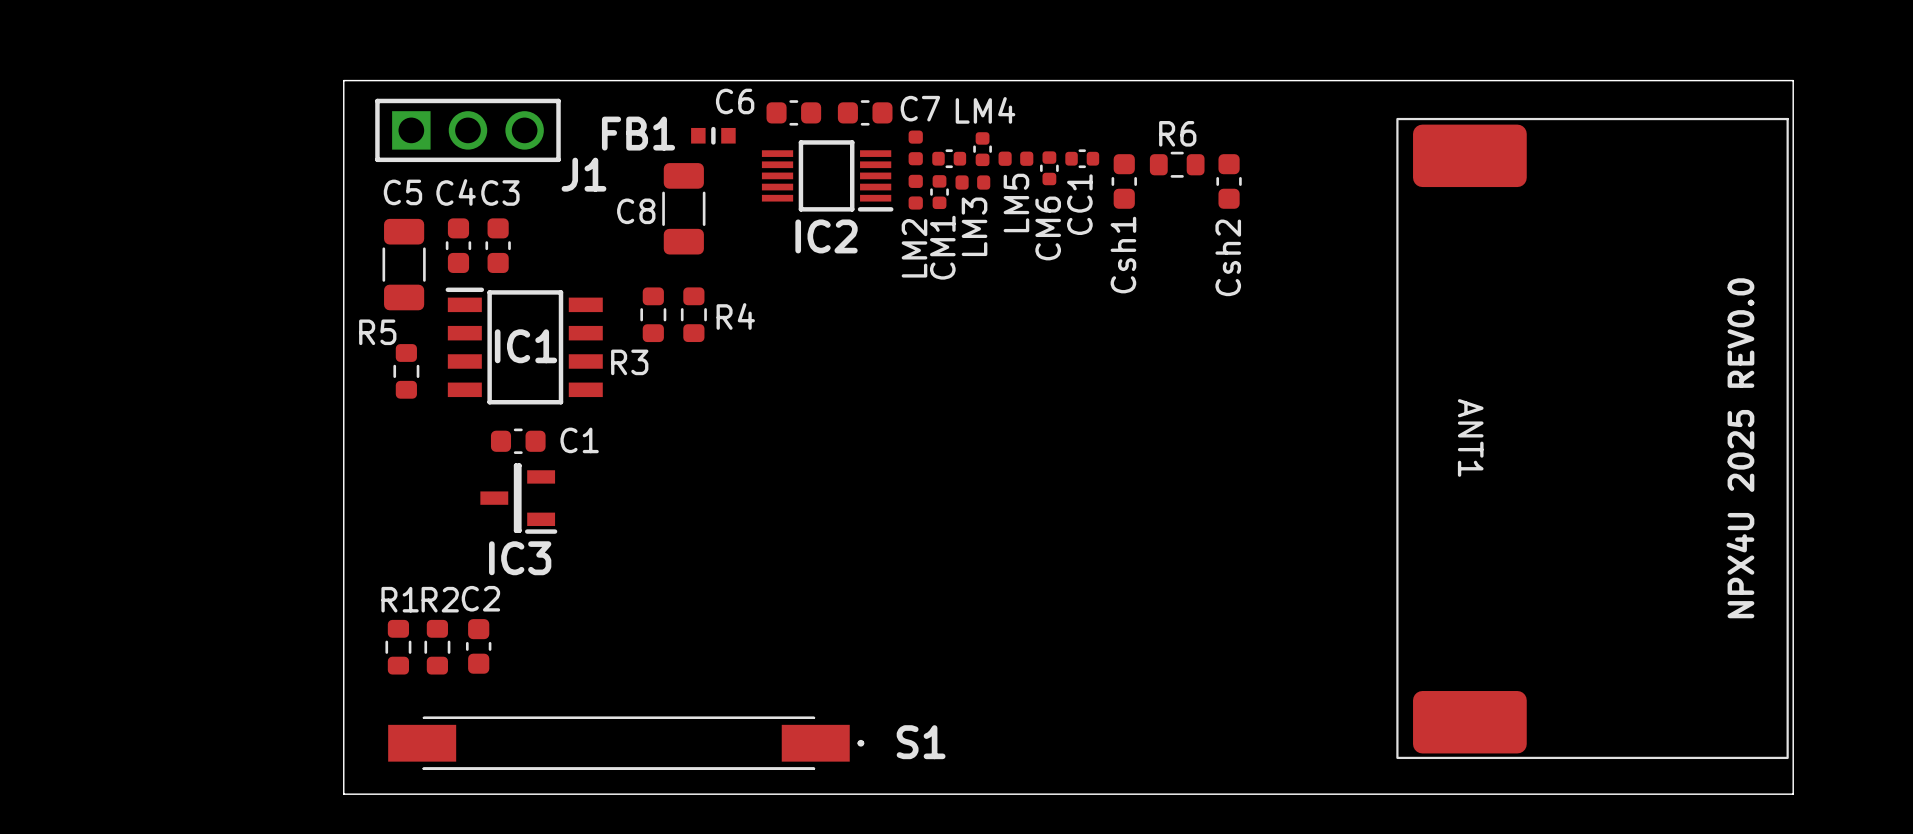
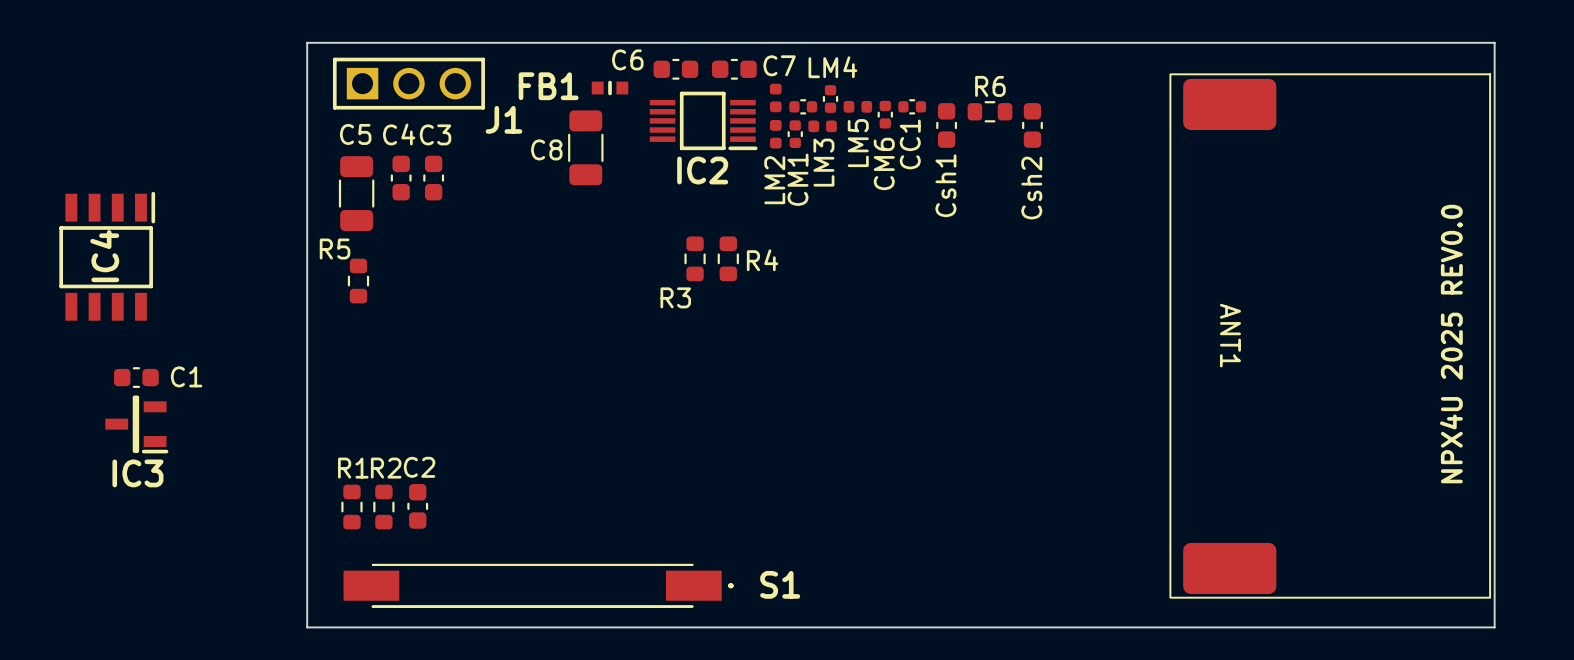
R3 position: (653, 314) -> (695, 258)
R4 position: (693, 314) -> (728, 258)
IC4: none -> (107, 256)
IC1: (524, 346) -> none
C1 position: (518, 441) -> (136, 377)
IC3 position: (518, 498) -> (136, 424)

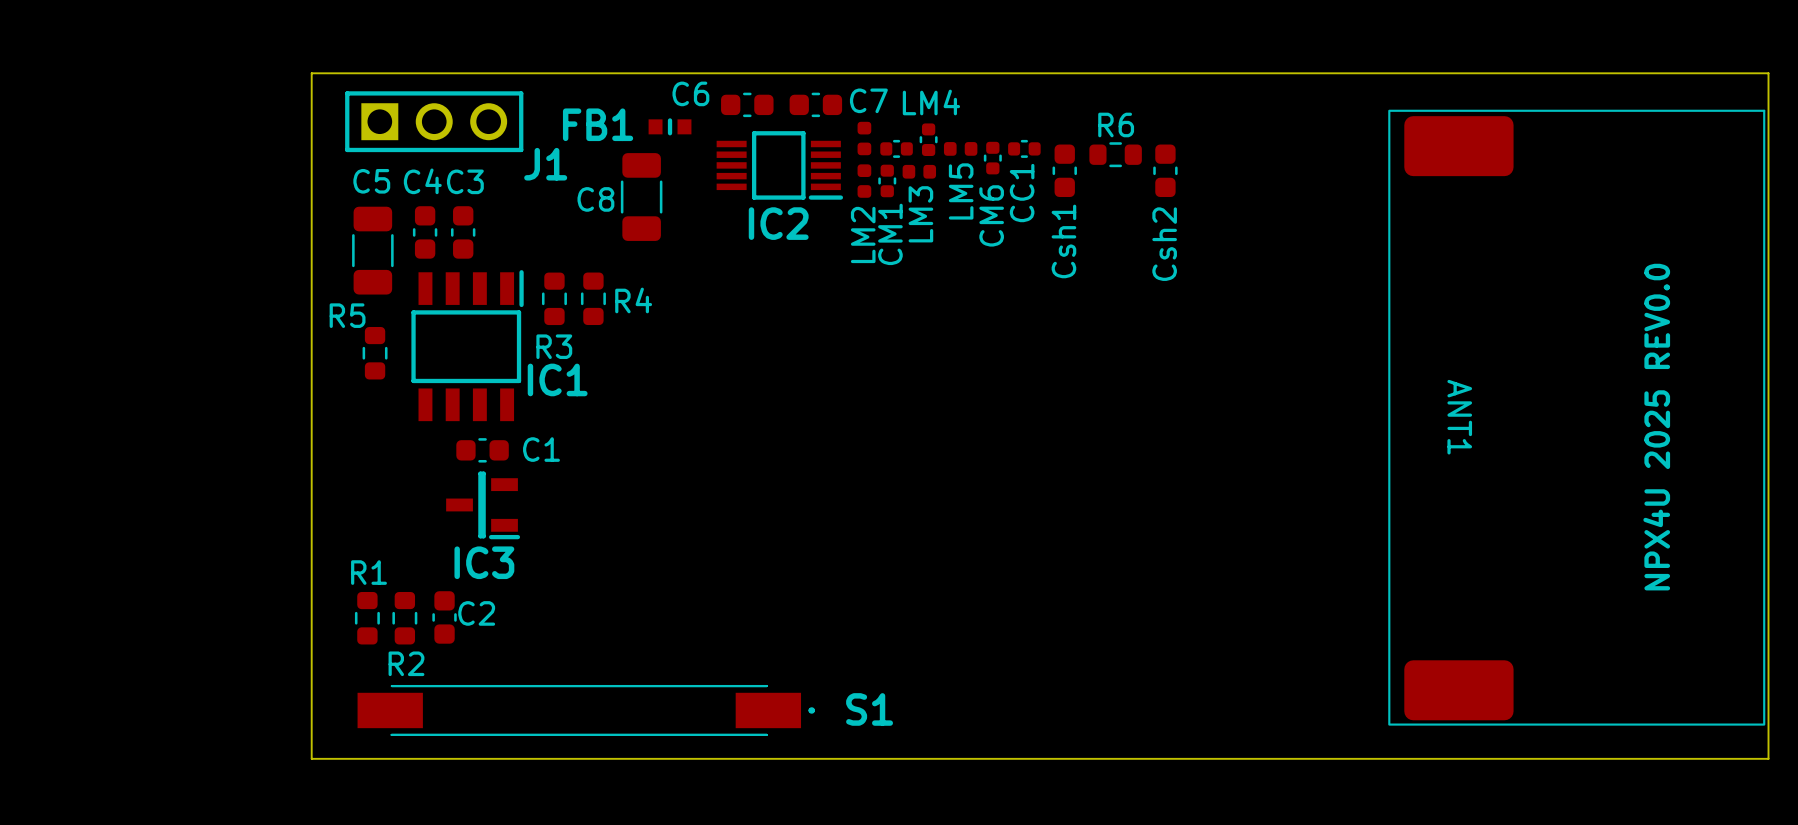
board edge: (307, 42) (1494, 42) (1494, 627) (307, 627) (307, 42) -> (311, 73) (311, 758) (1768, 758) (1768, 73) (311, 73)
IC4: (107, 256) -> none
R3 position: (695, 258) -> (554, 298)
R4 position: (728, 258) -> (593, 298)
IC1: none -> (467, 345)
R3 name position: R3 (675, 297) -> R3 (554, 346)
ANT1 position: (1330, 336) -> (1576, 417)
C1 position: (136, 377) -> (482, 450)
IC3 position: (136, 424) -> (483, 505)
C2 name position: C2 (419, 467) -> C2 (476, 613)
R2 name position: R2 (386, 468) -> R2 (406, 663)

